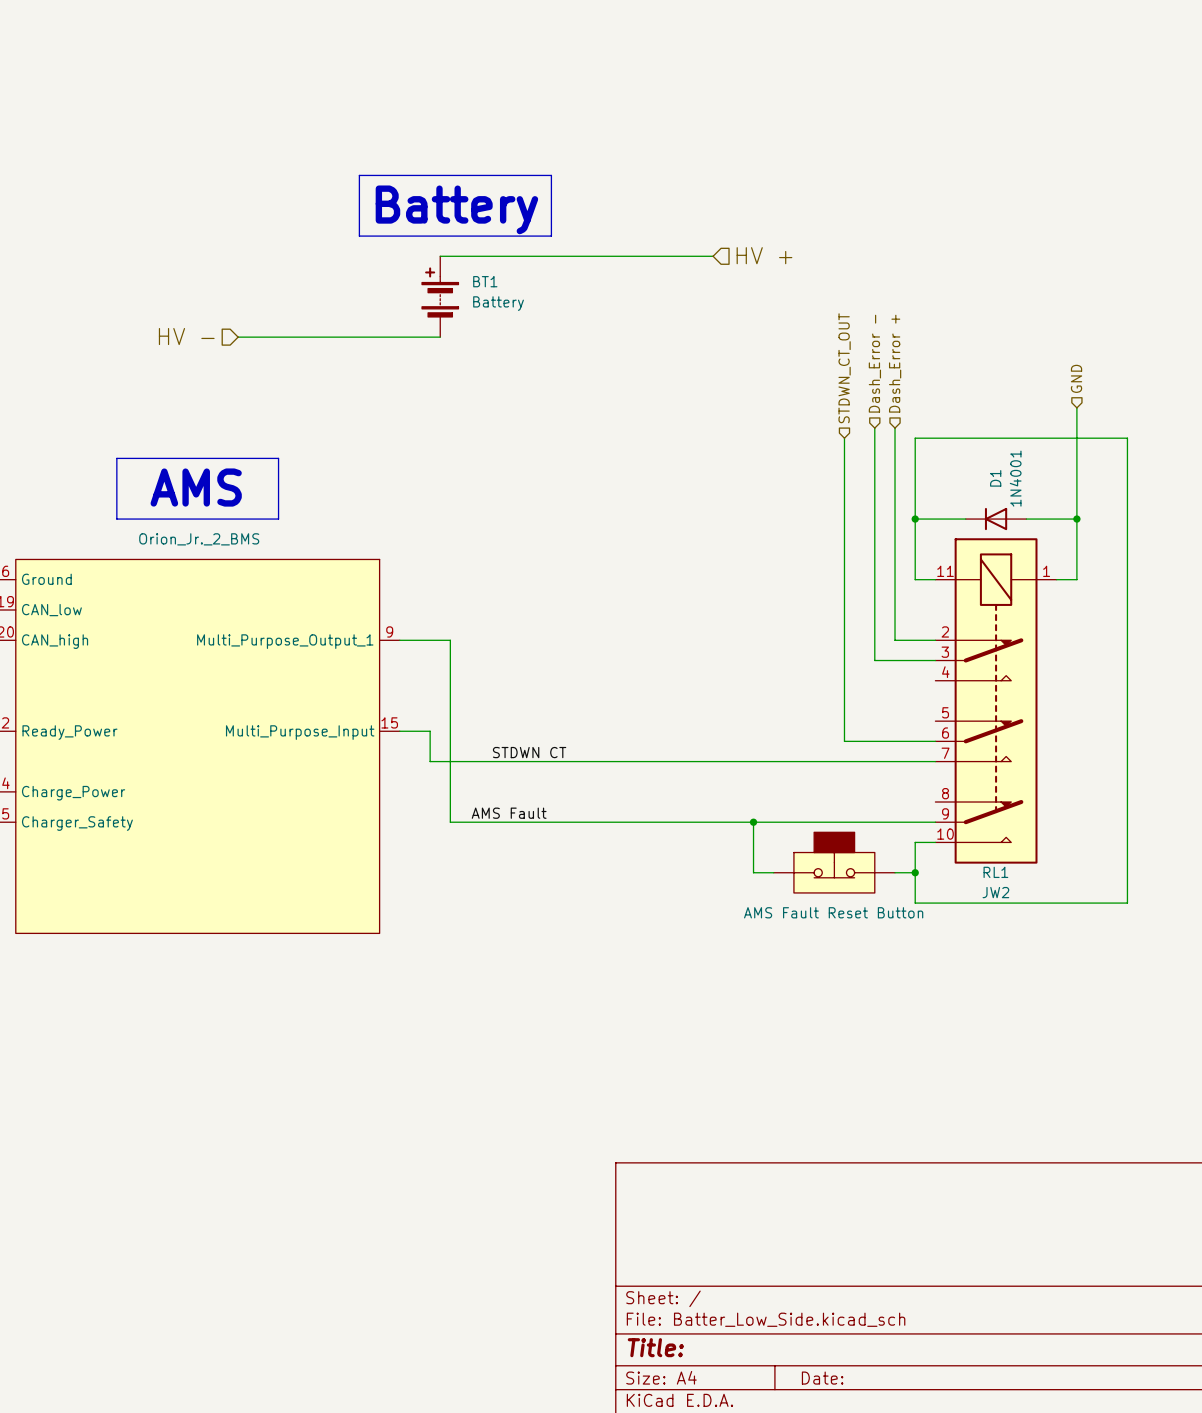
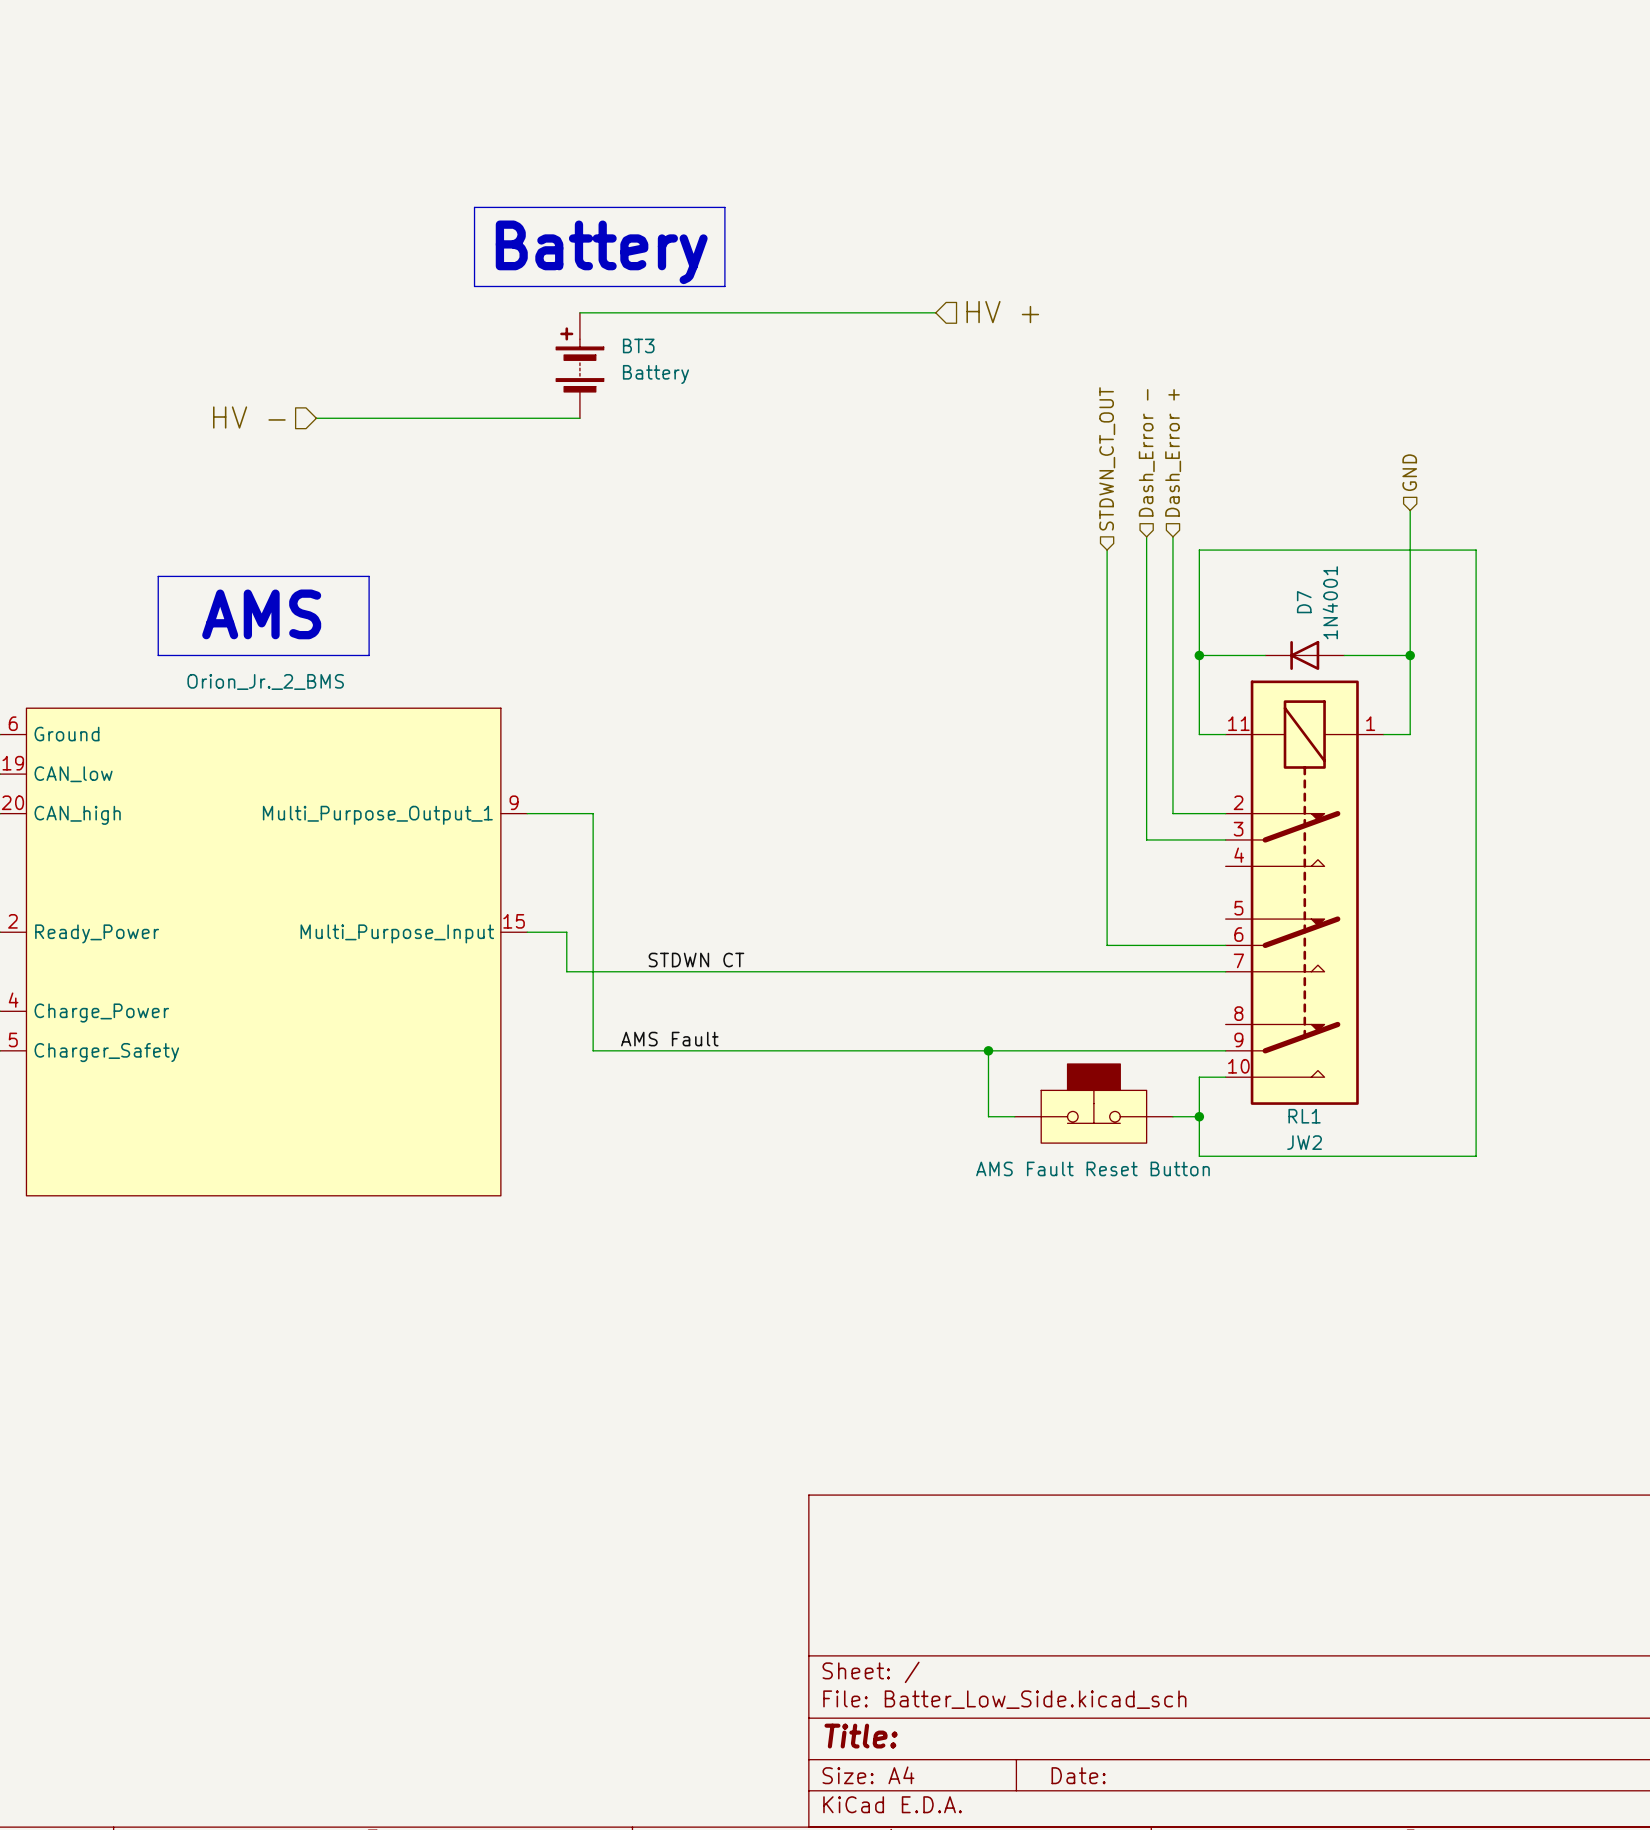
BT1 name: BT1 (485, 281) -> BT3 (638, 345)
D1 name: D1 (995, 478) -> D7 (1304, 602)

